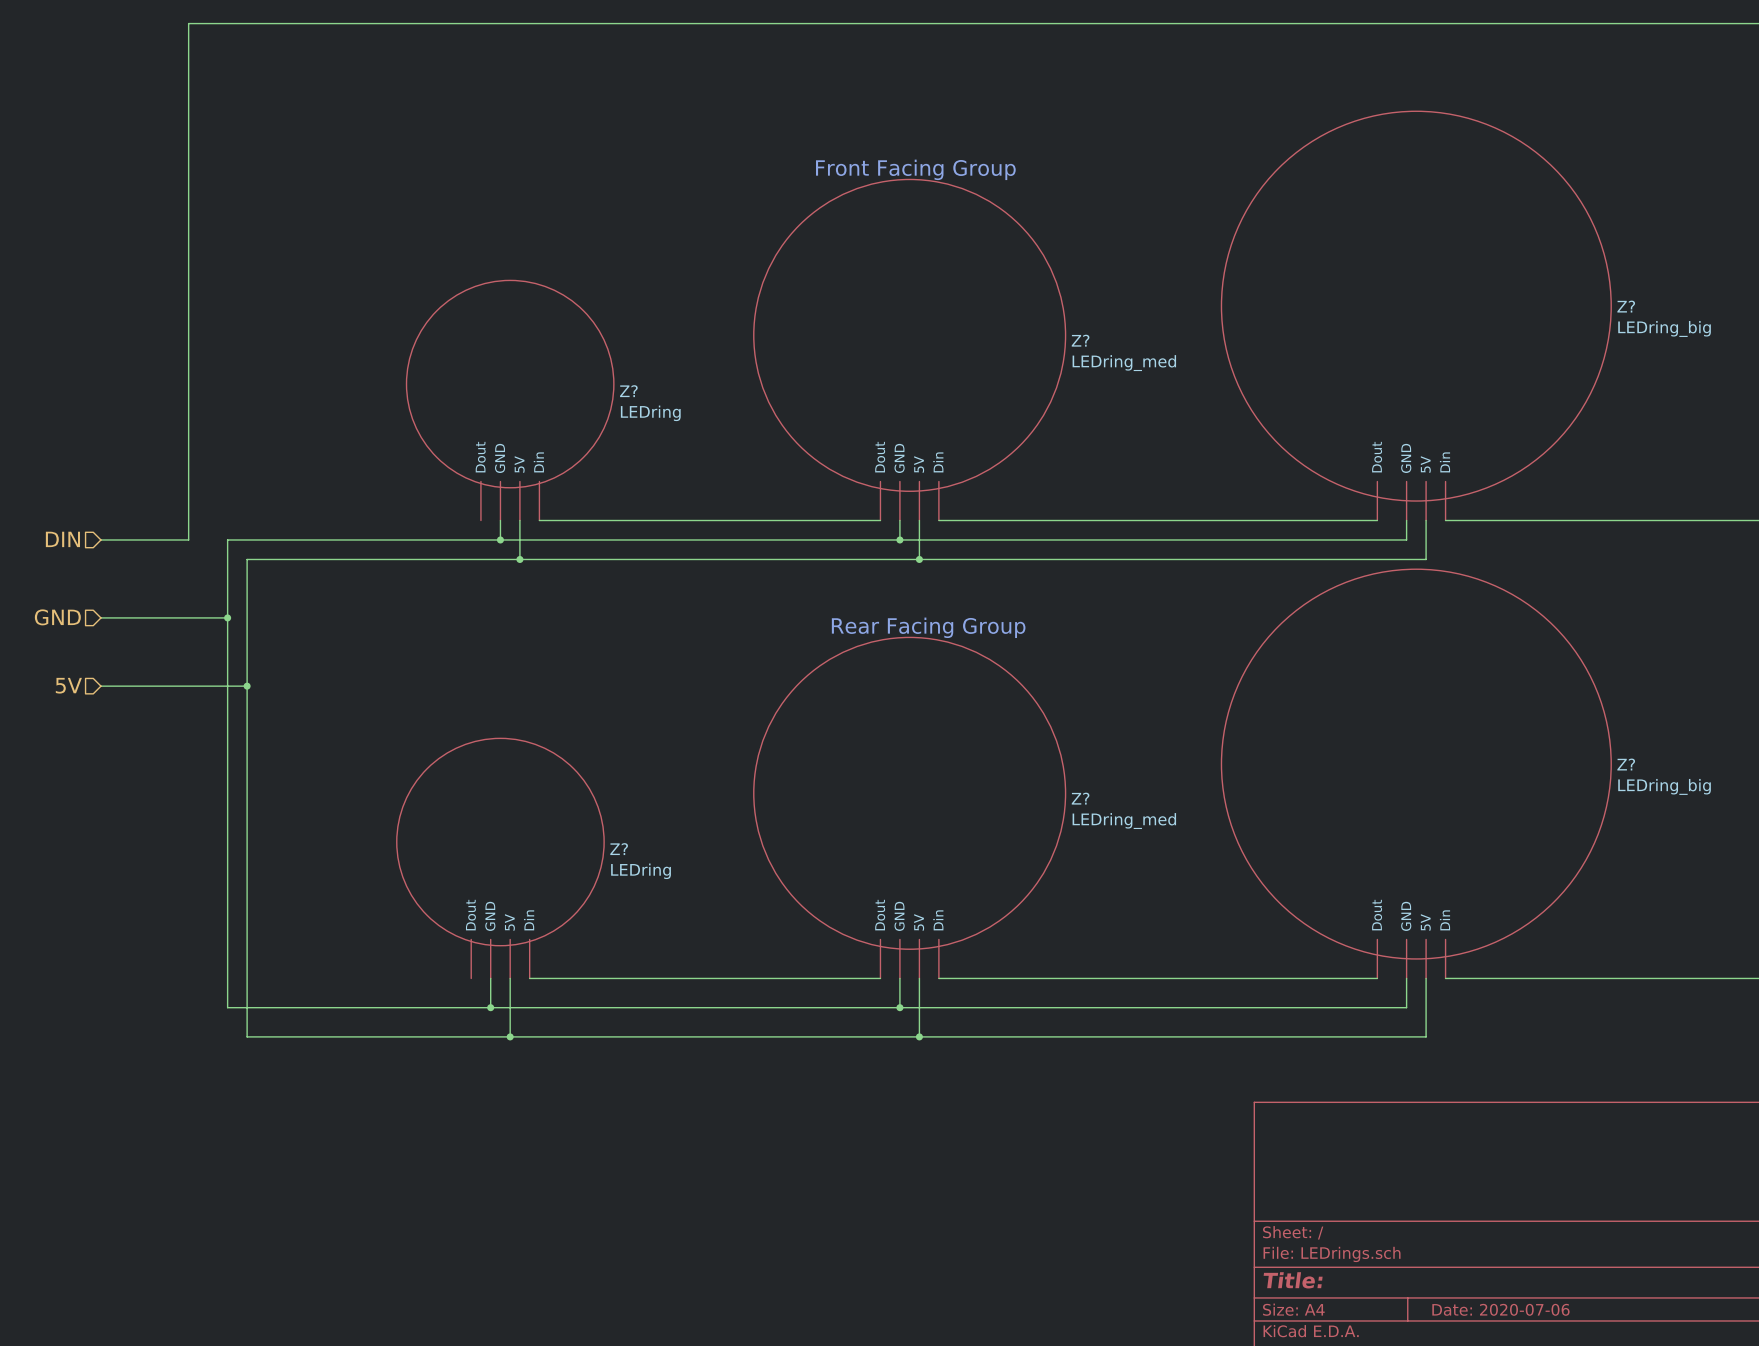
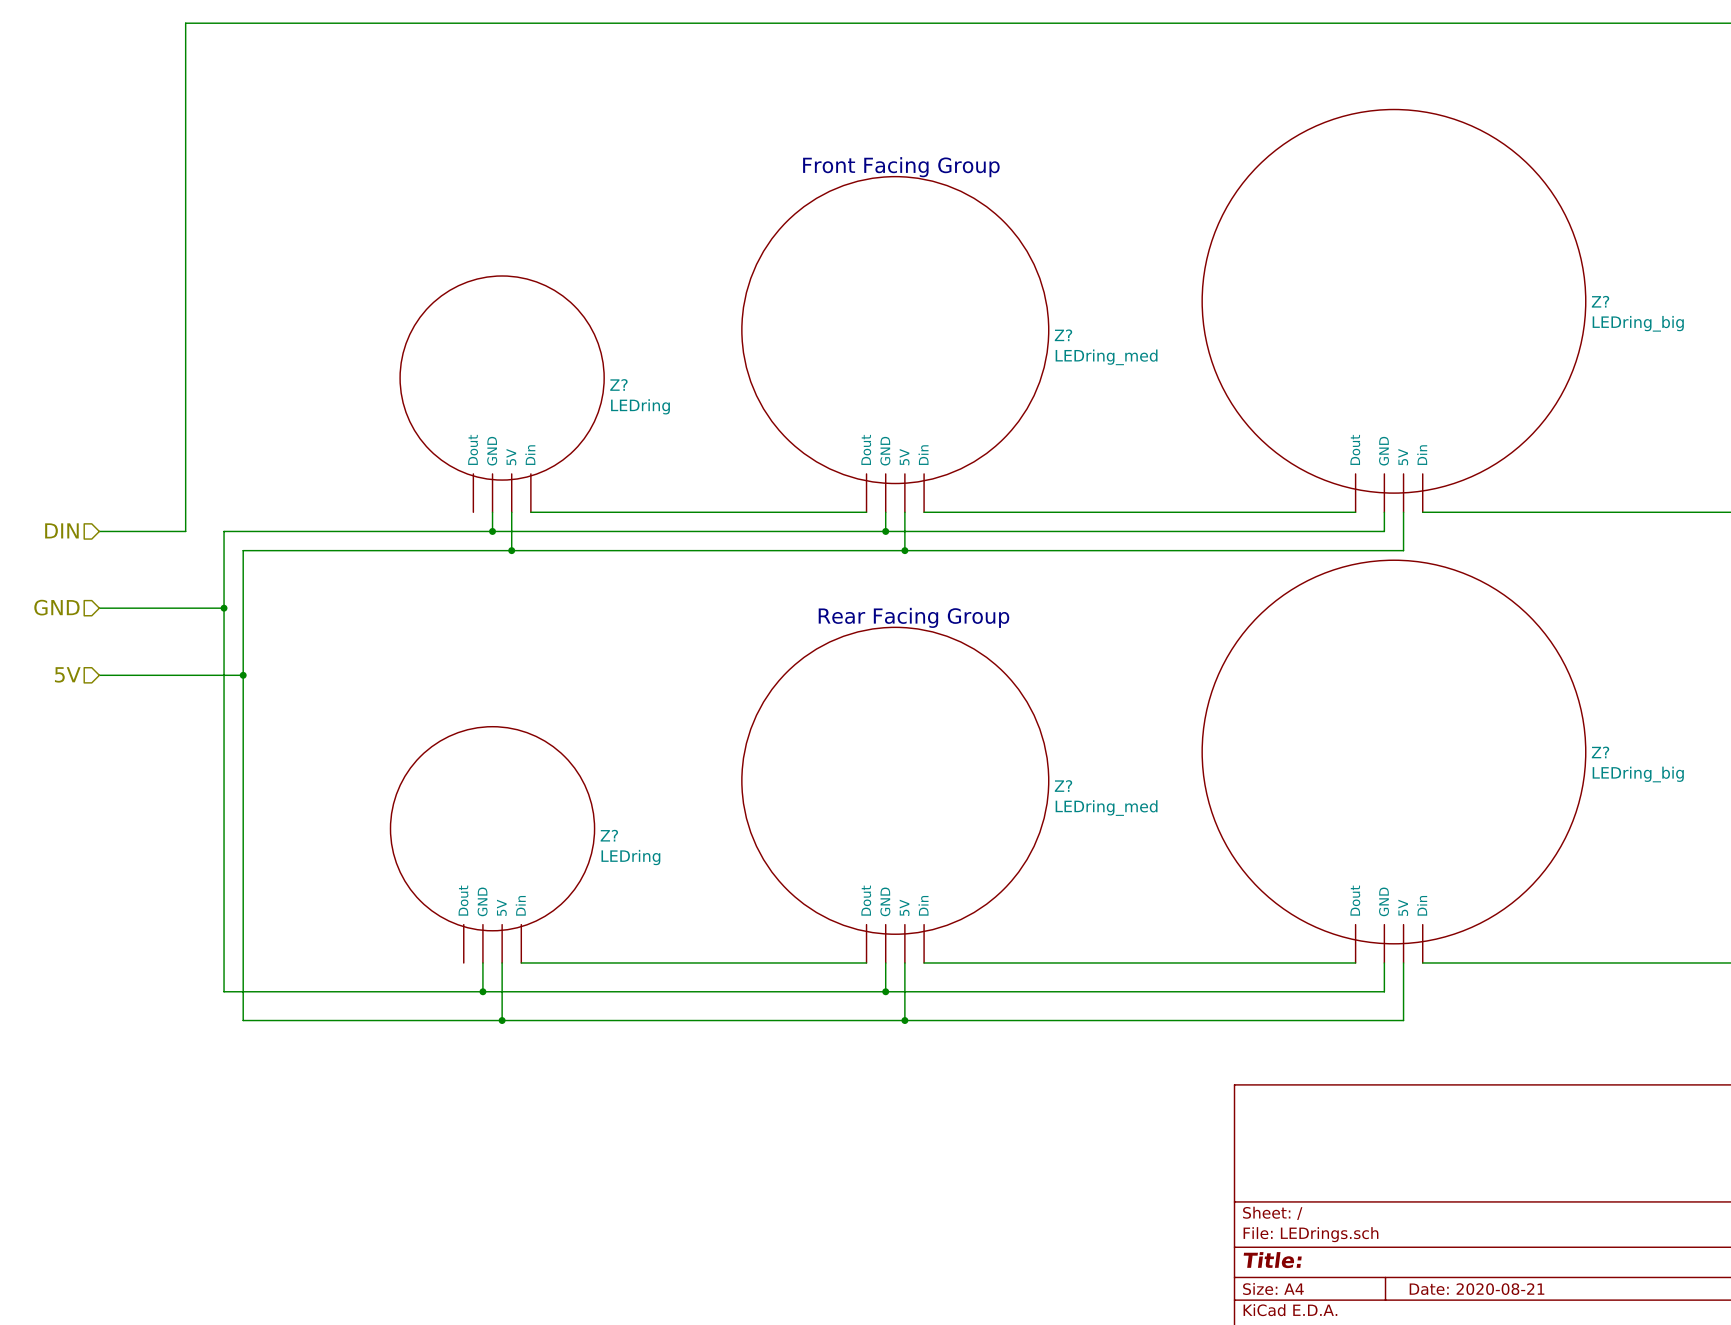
title block: Date: 2020-07-06 (1500, 1309) -> Date: 2020-08-21 (1477, 1289)

